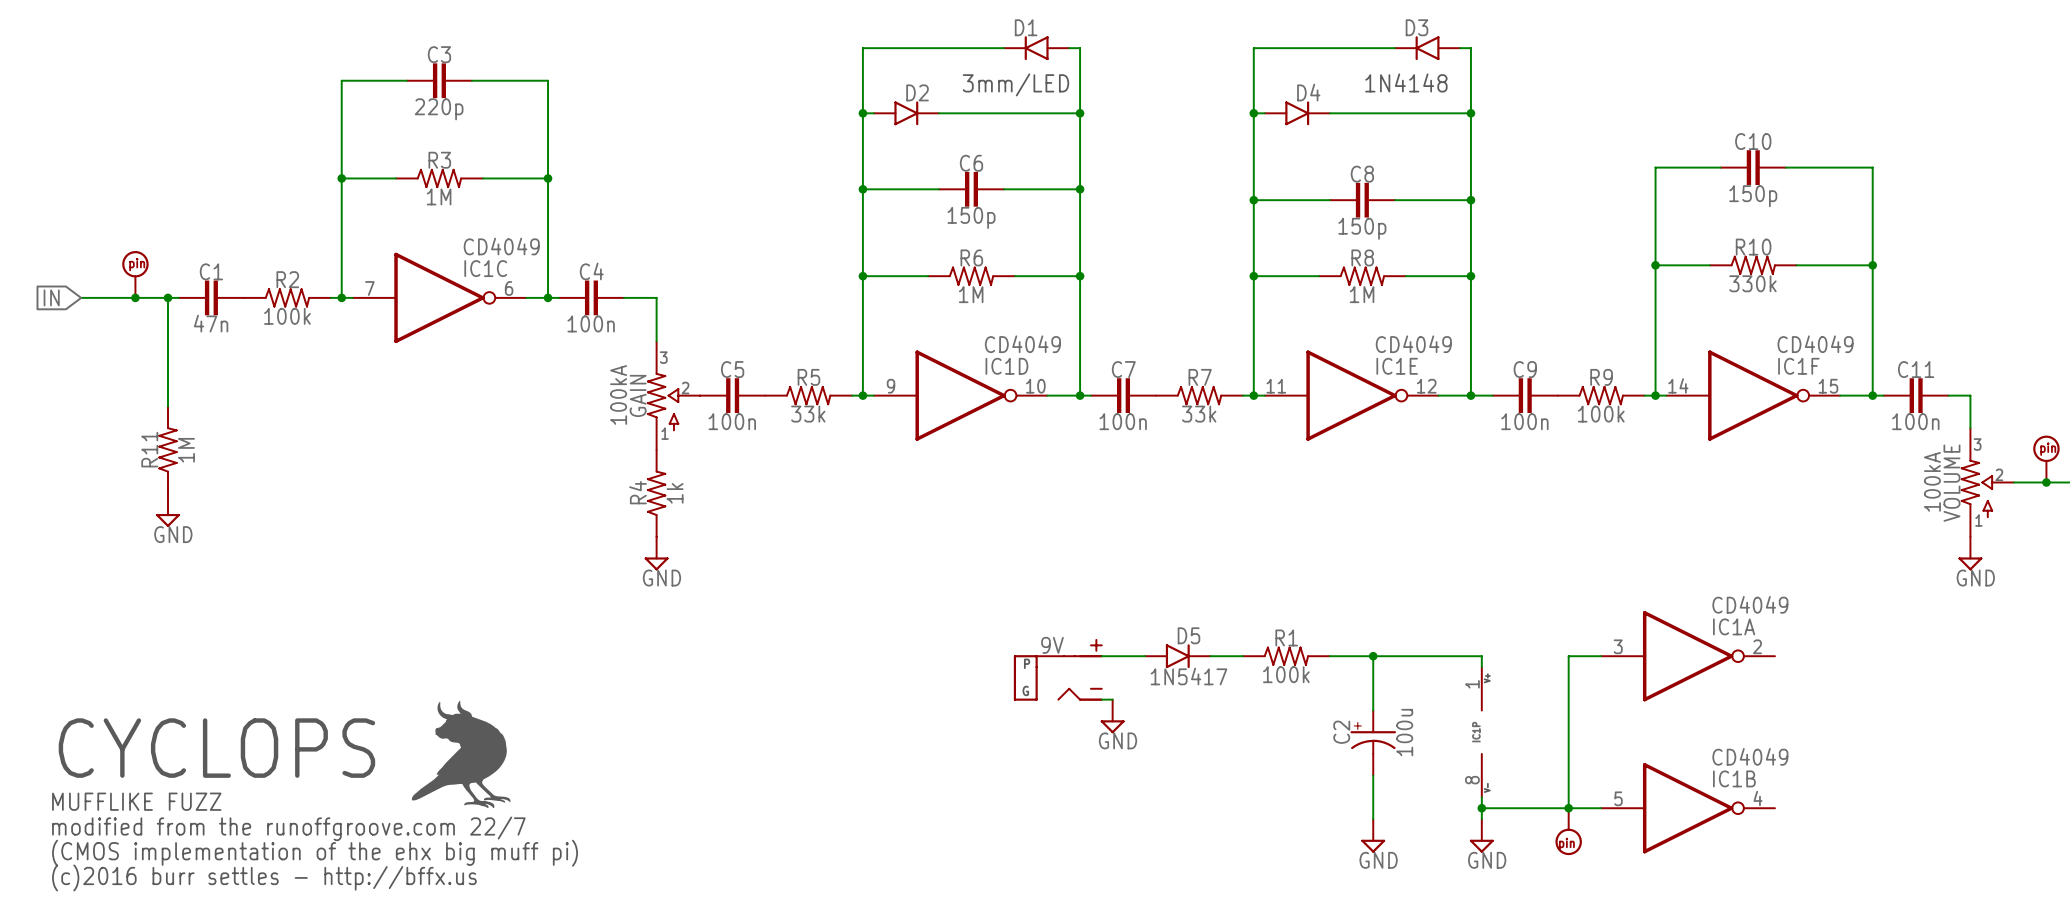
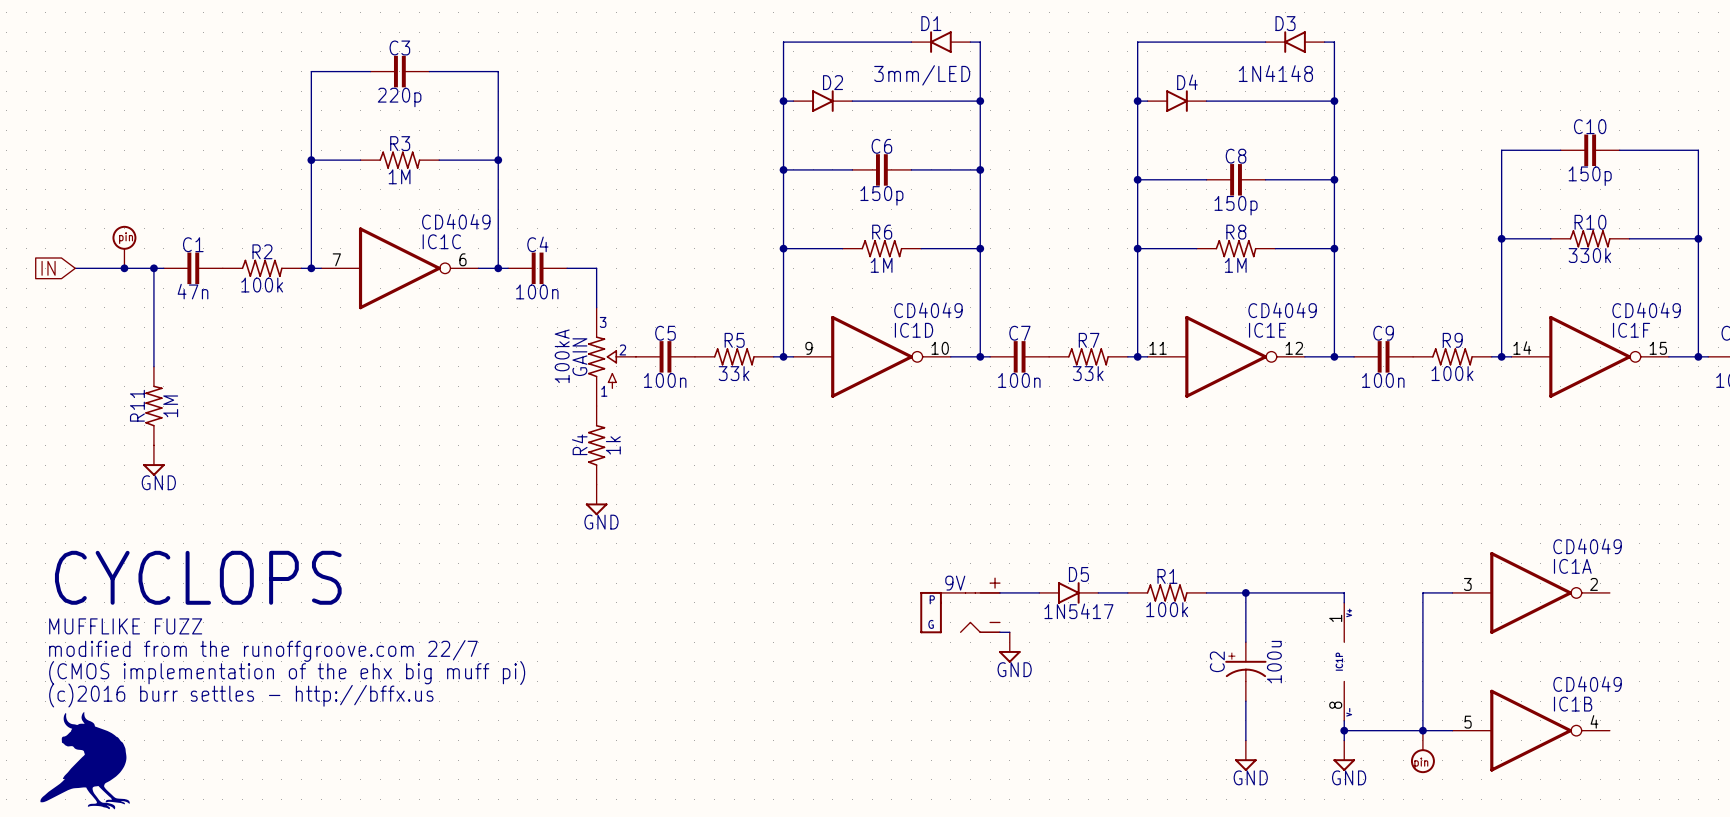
text position: CYCLOPS (216, 748) -> CYCLOPS (198, 577)
part: (461, 753) -> none
text position: MUFFLIKE FUZZ (136, 801) -> MUFFLIKE FUZZ (125, 626)
text position: modified from the runoffgroove.com 22/7 (288, 828) -> modified from the runoffgroove.com 22/7 (263, 650)
part: none -> (85, 760)
text position: (CMOS implementation of the ehx big muff pi) (315, 853) -> (CMOS implementation of the ehx big muff pi) (287, 673)
text position: (c)2016 burr settles - http://bffx.us (264, 877) -> (c)2016 burr settles - http://bffx.us (241, 695)

